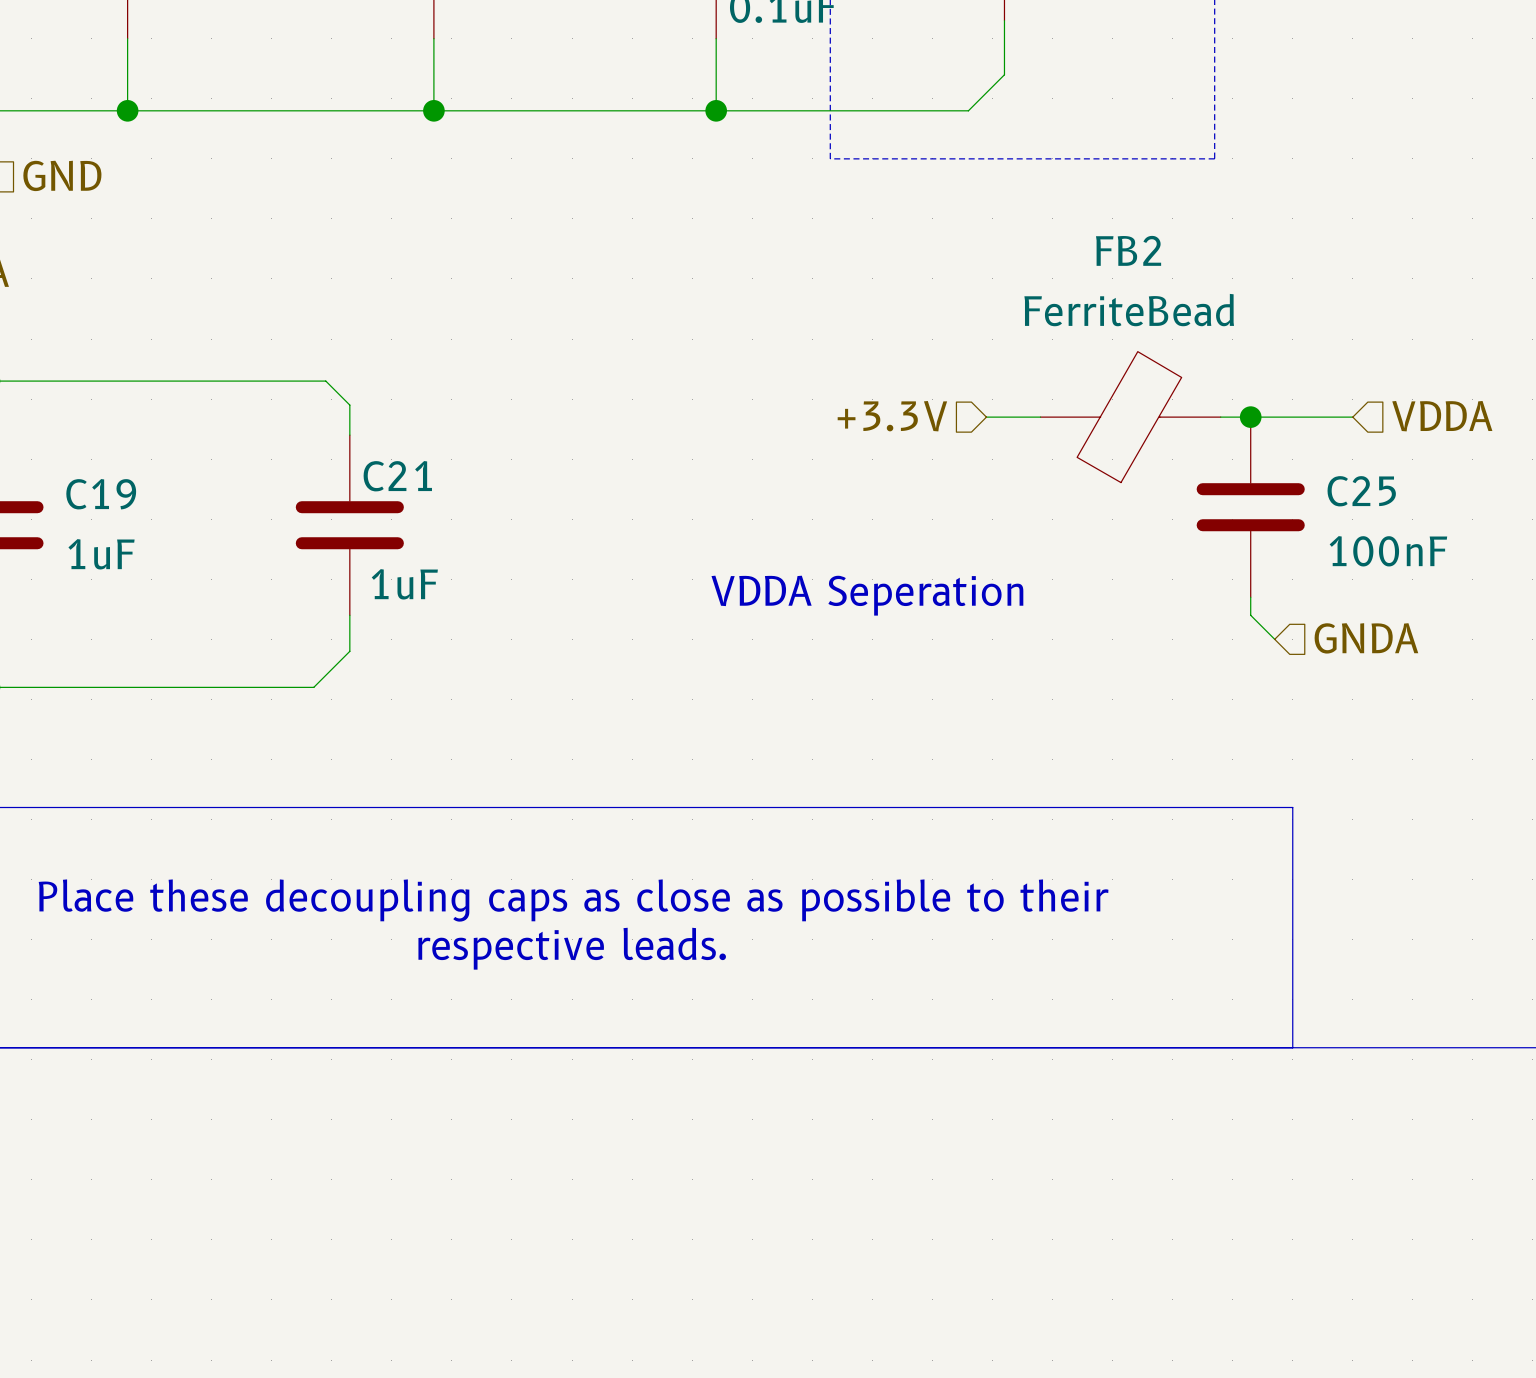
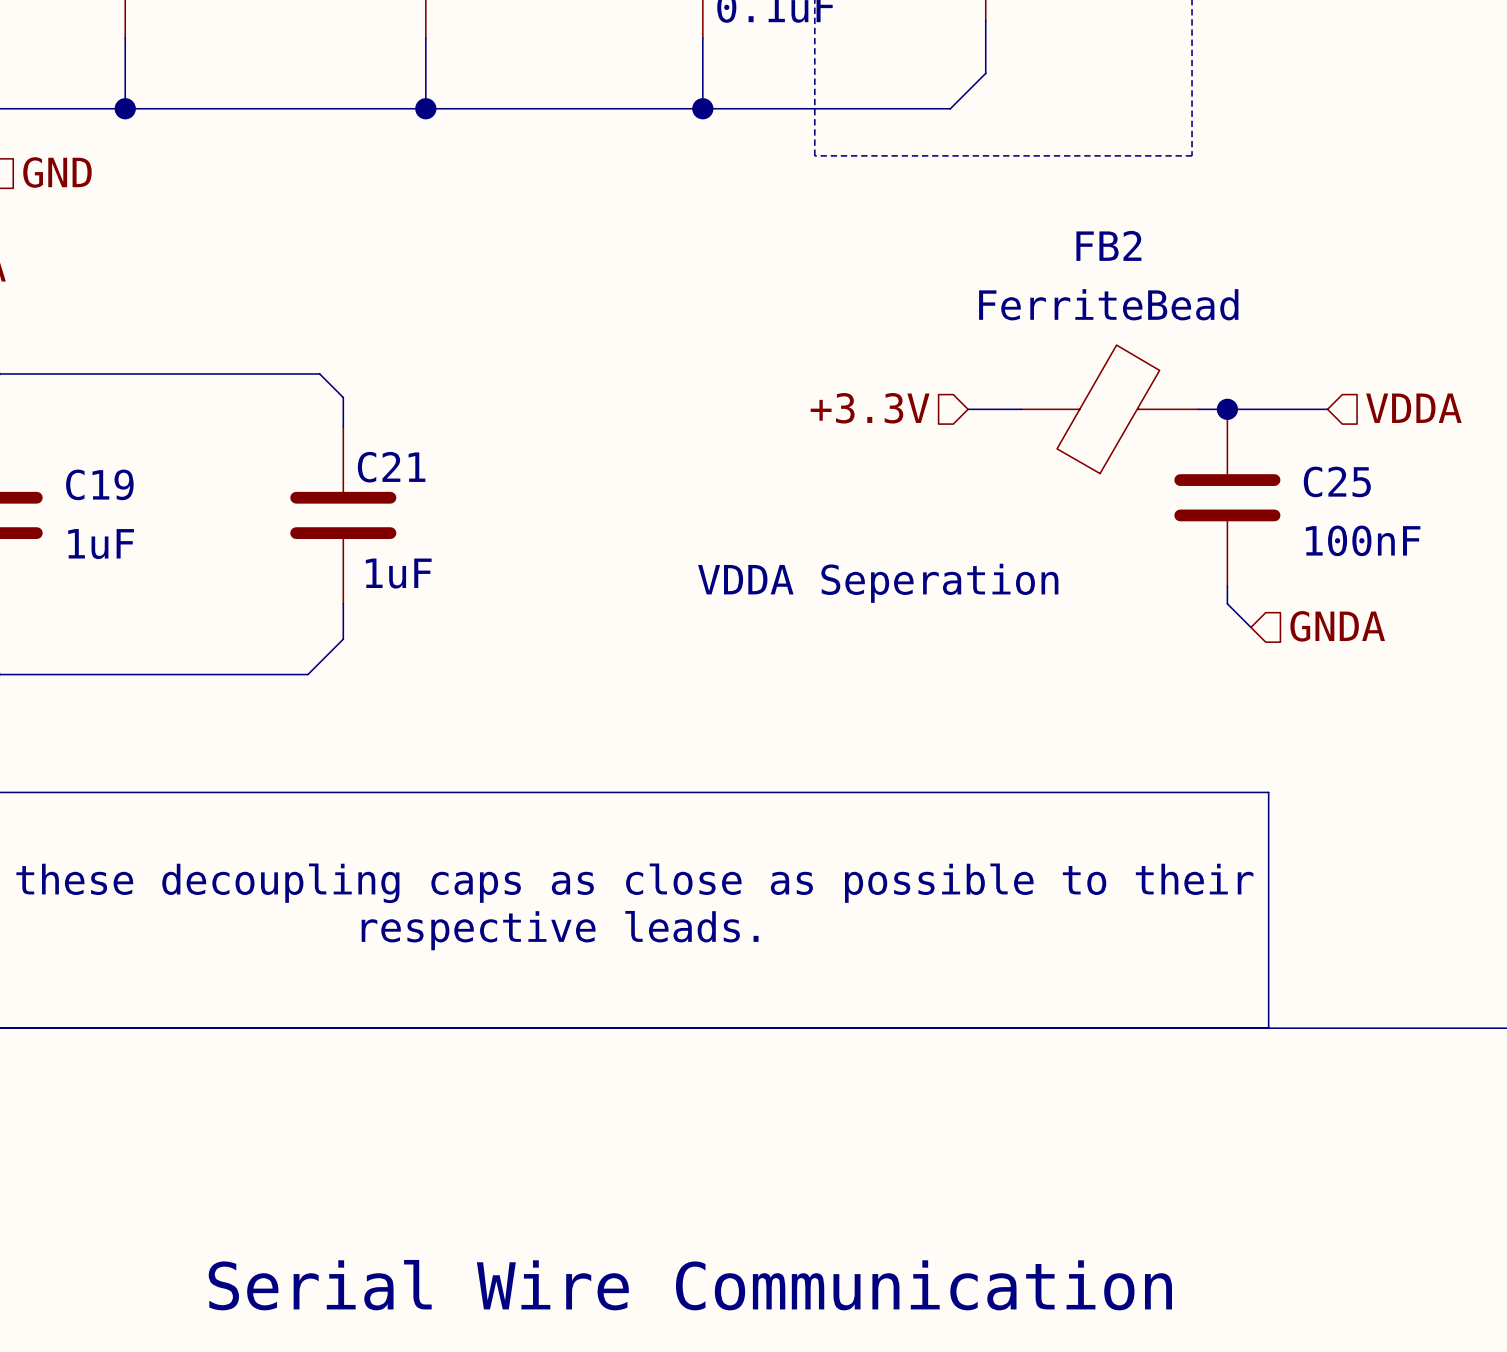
text: none -> Serial Wire Communication (690, 1285)

